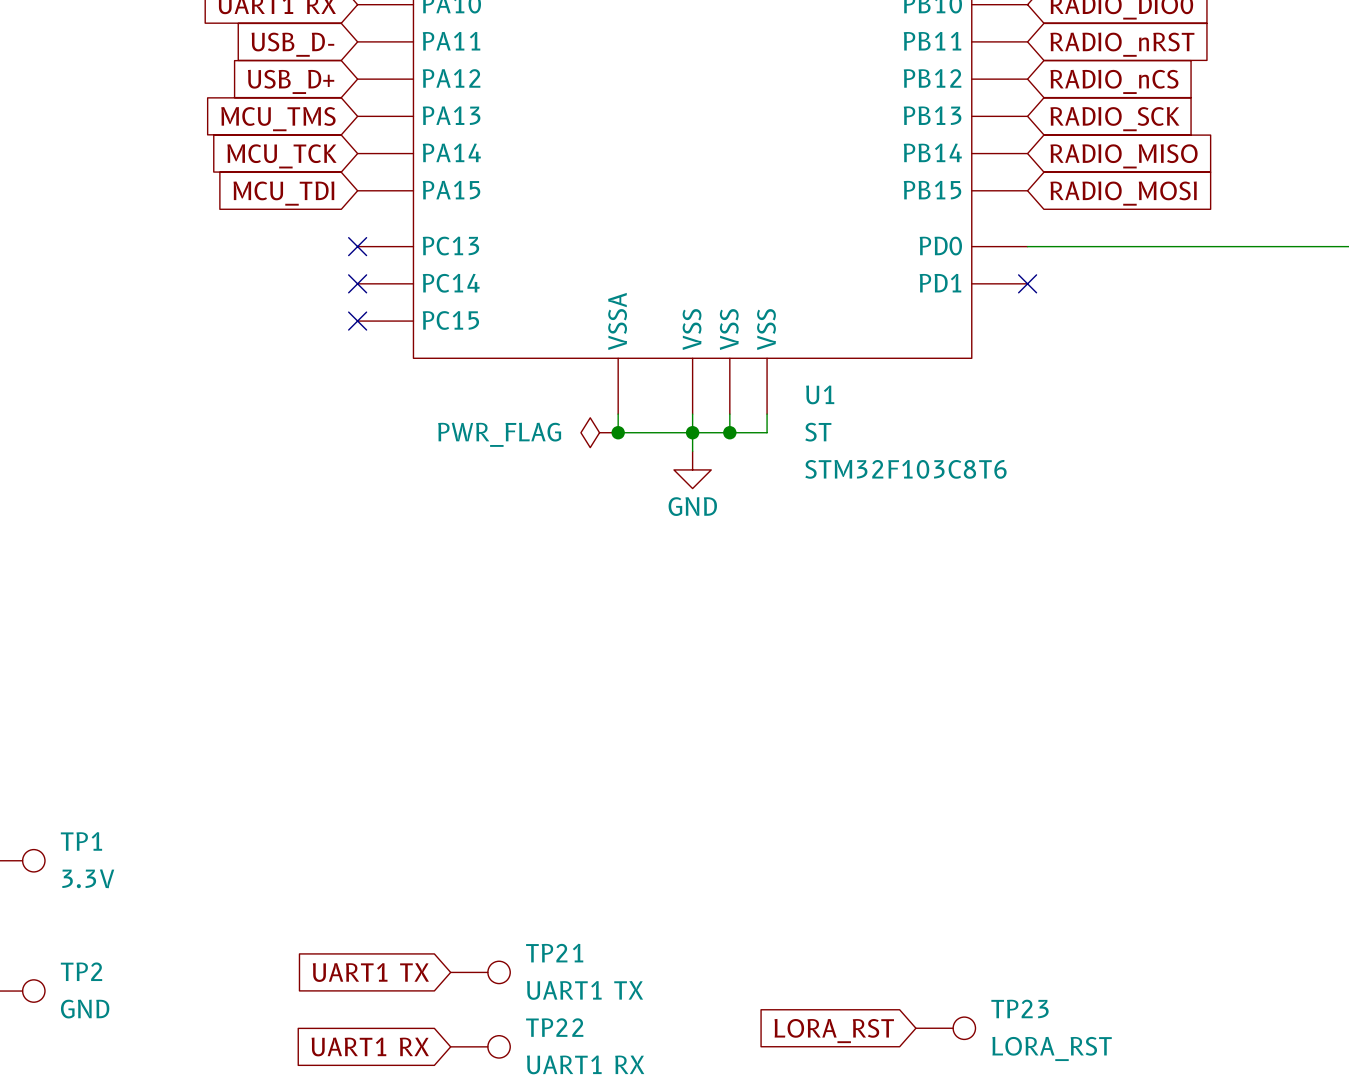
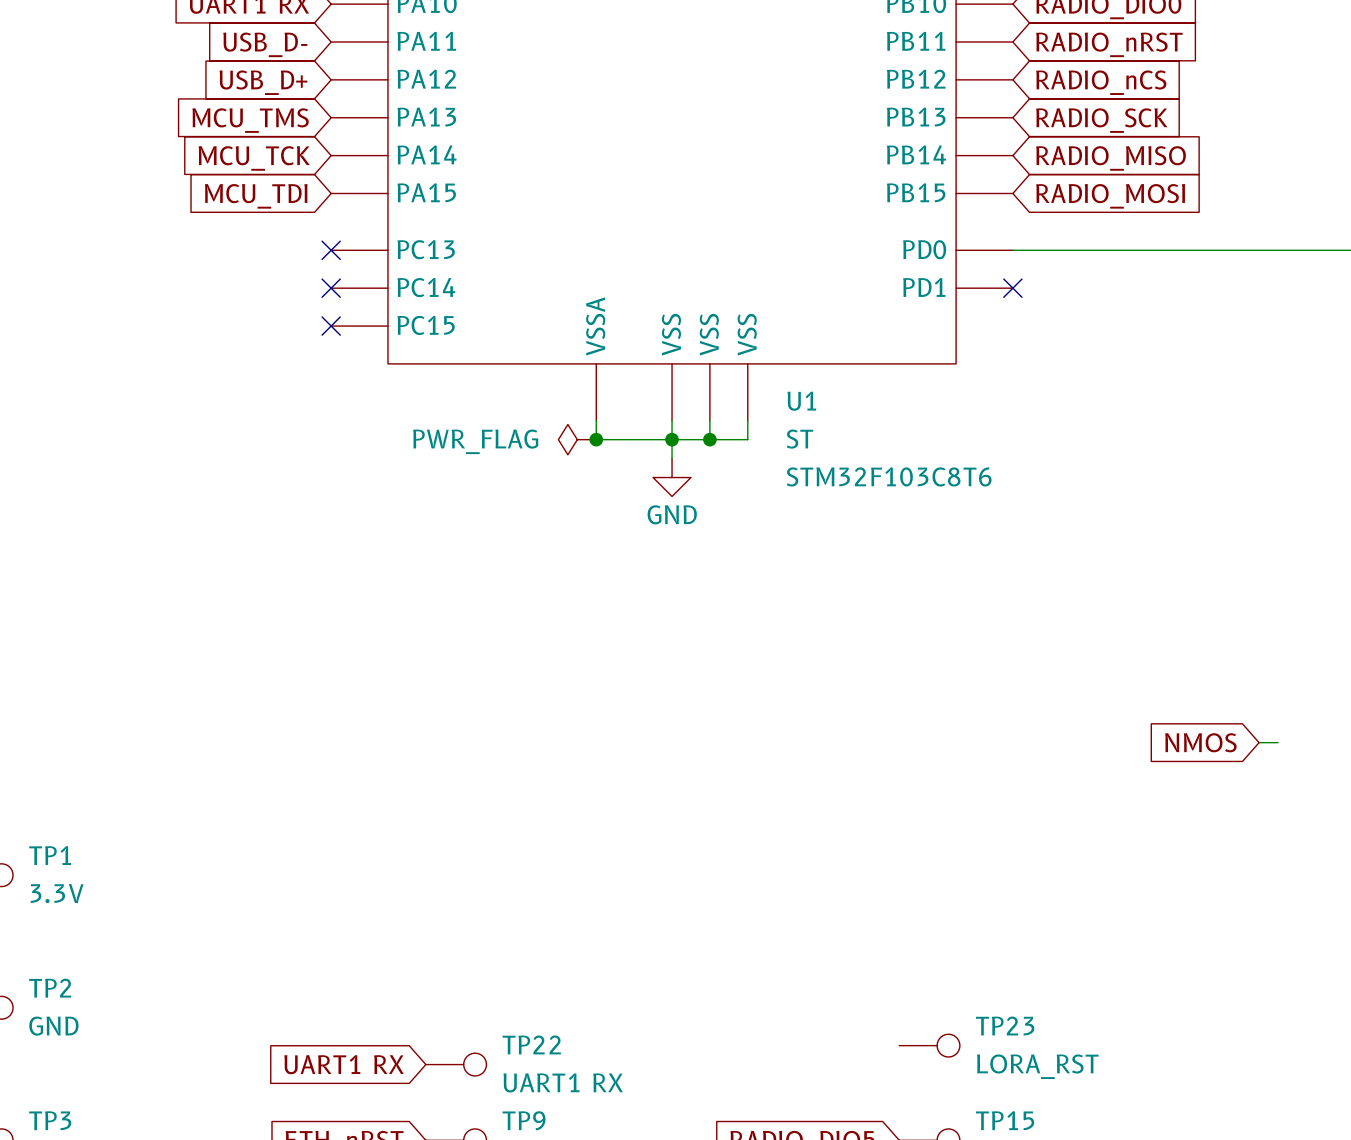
global label: none -> NMOS (1200, 742)
wire: none -> (1259, 742) (1277, 742)
global label: UART1 TX (370, 972) -> none
TP21: UART1 TX (480, 972) -> none
global label: LORA_RST (834, 1031) -> none

